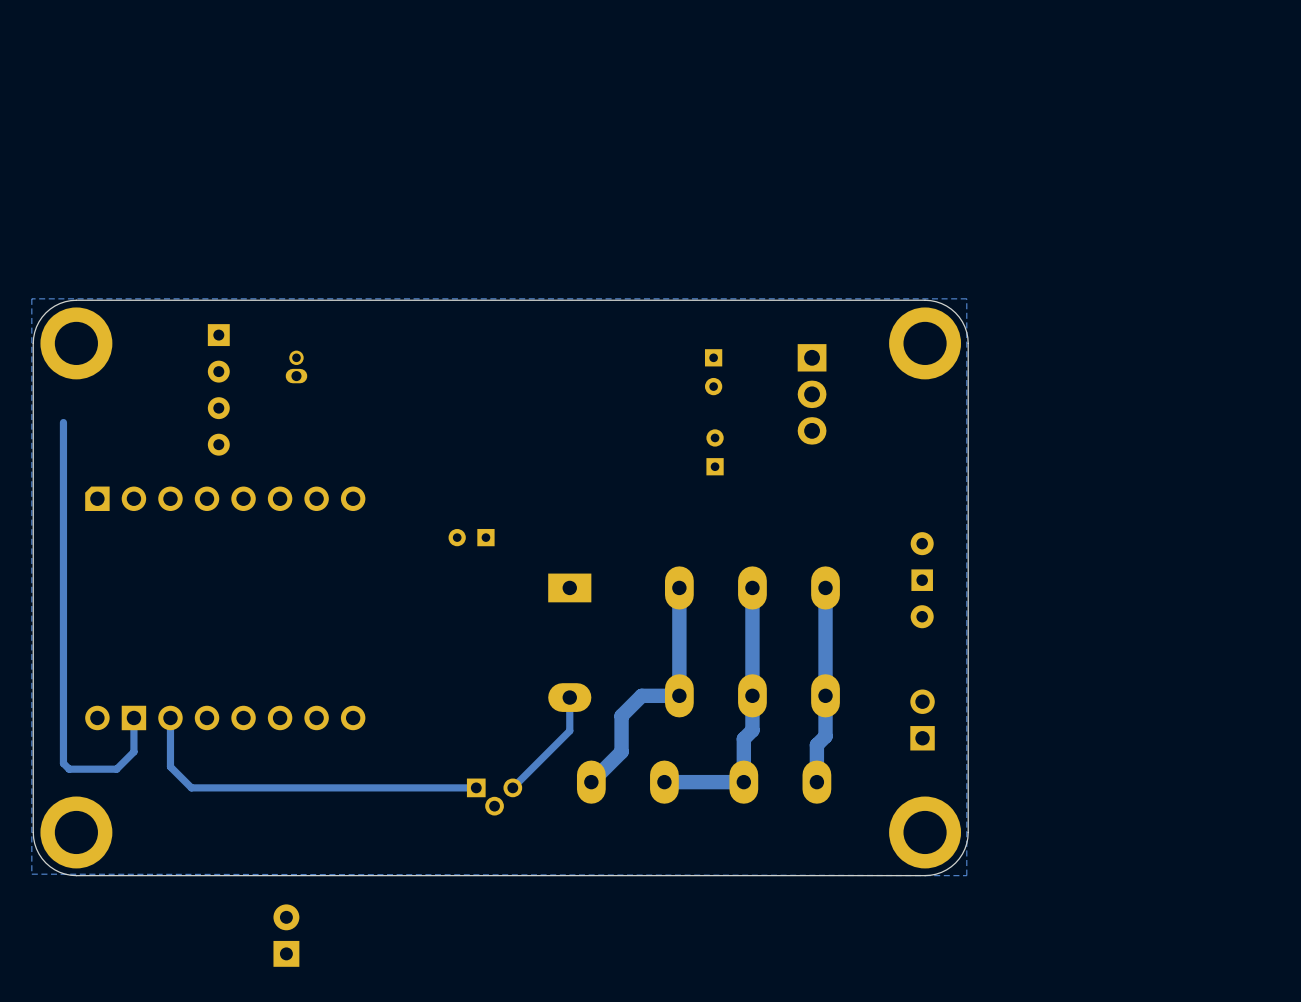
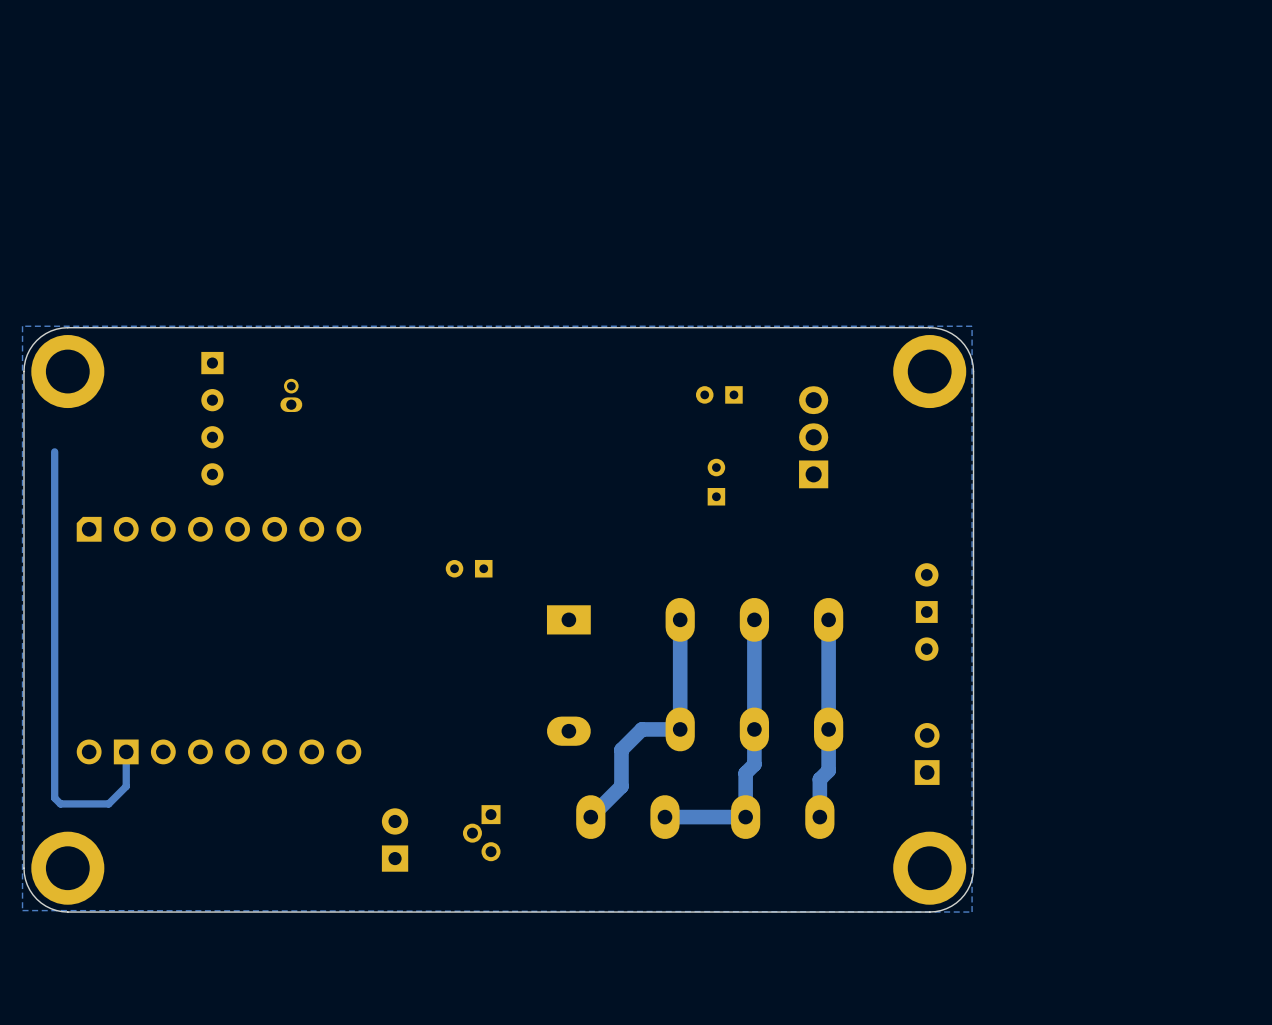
part rotation: 0° (713, 372) -> 90° clockwise (719, 394)
part rotation: 0° (812, 394) -> 180° (813, 437)
track: (569, 697) (569, 730) (512, 787) -> none
track: (170, 717) (170, 766) (191, 787) (476, 787) -> none
part rotation: 0° (494, 797) -> 90° clockwise (481, 833)
part position: (286, 935) -> (395, 840)

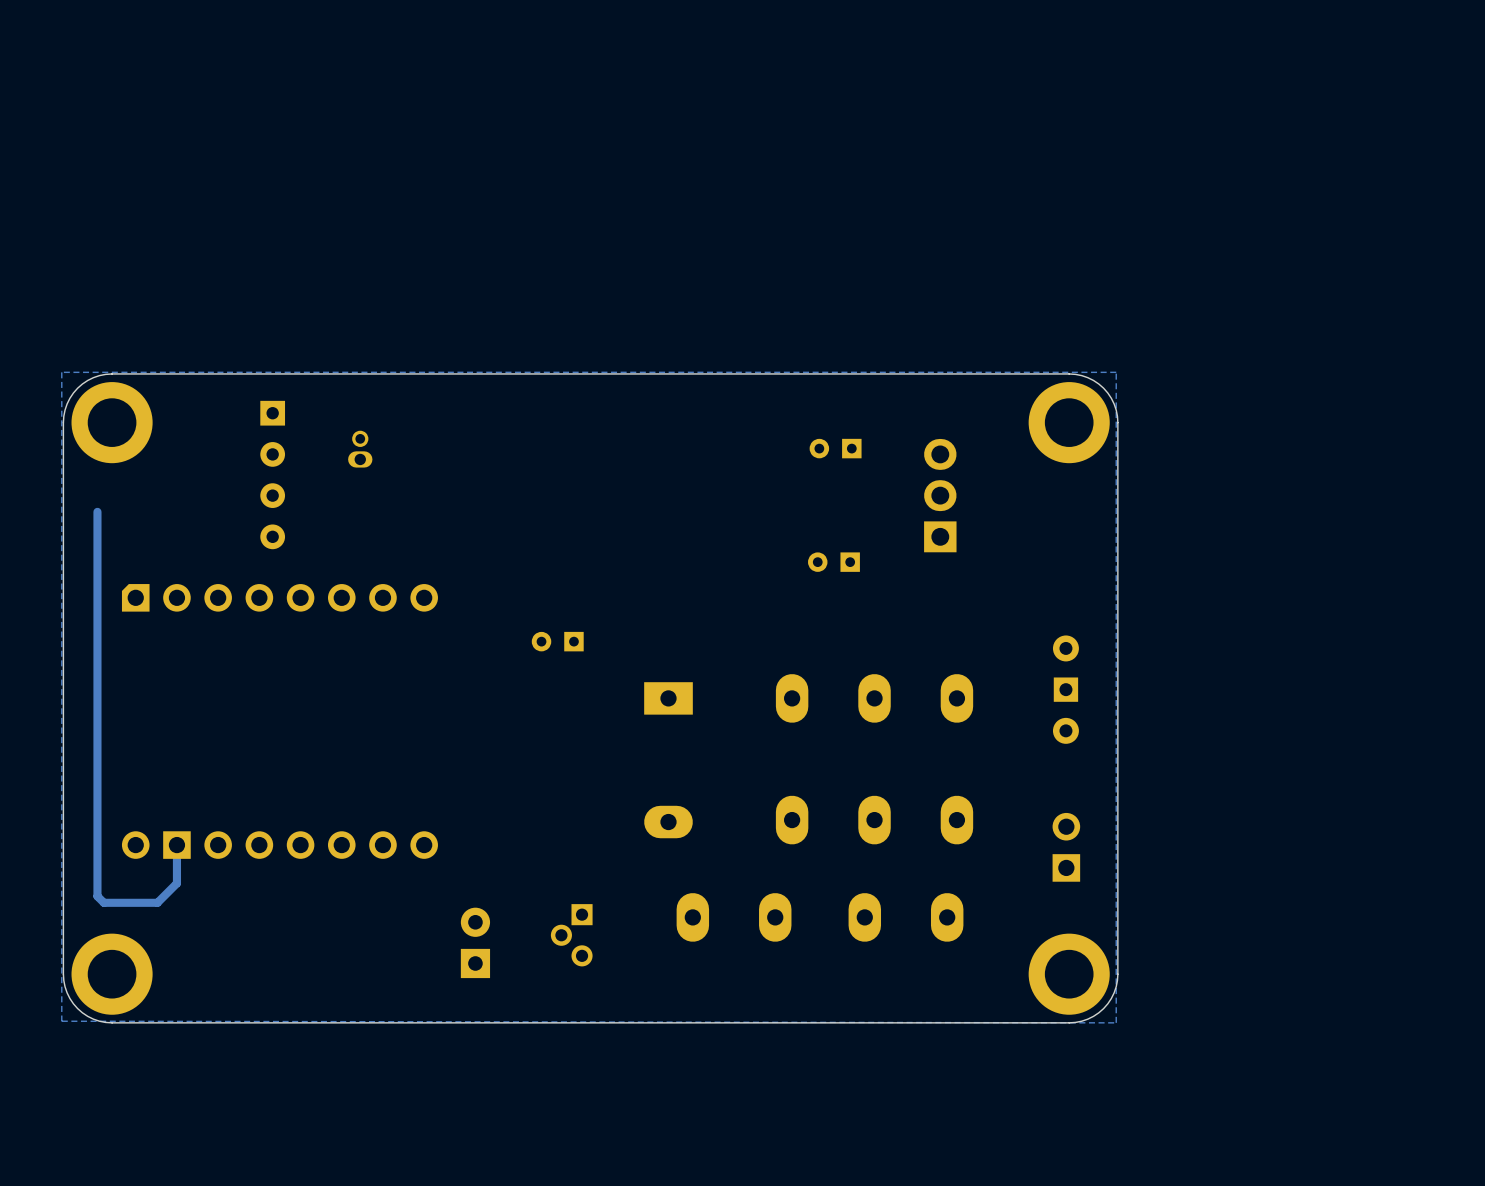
part rotation: 0° (716, 482) -> 90° counterclockwise (833, 562)
track: (680, 619) (680, 729) (641, 729) (621, 749) (621, 786) (590, 817) -> none
track: (754, 619) (754, 764) (745, 773) (745, 817) (665, 817) -> none
track: (828, 619) (828, 770) (819, 779) (819, 817) -> none

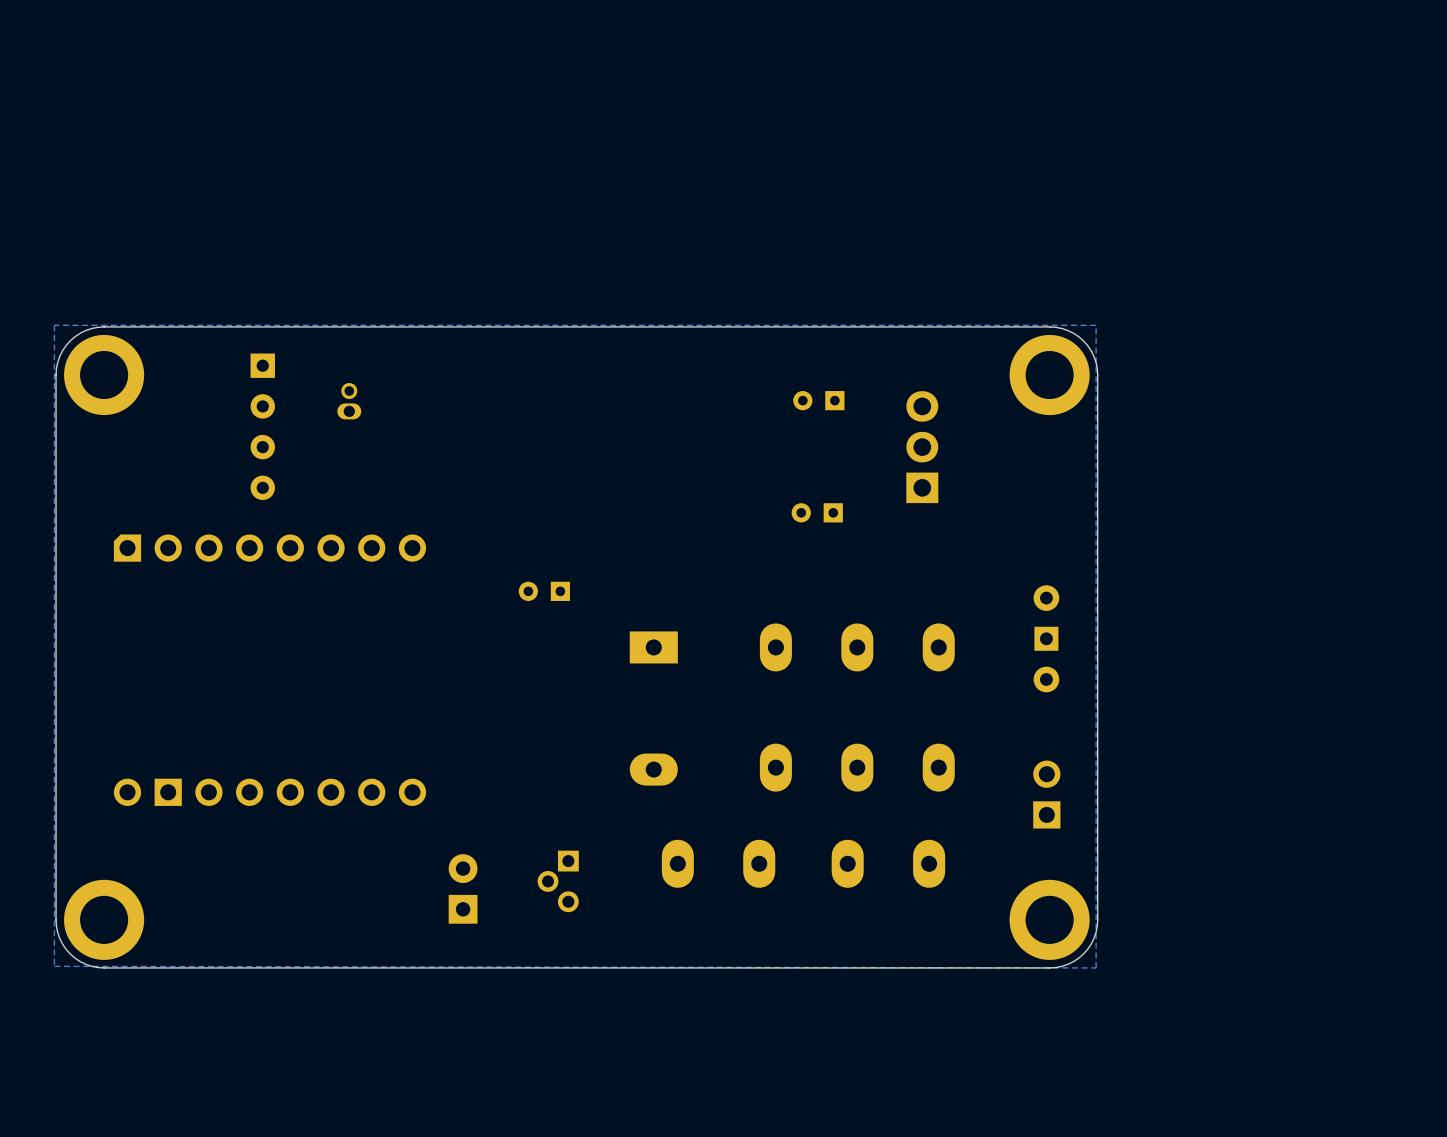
track: (97, 511) (97, 896) (103, 902) (157, 902) (176, 883) (176, 845) -> none

